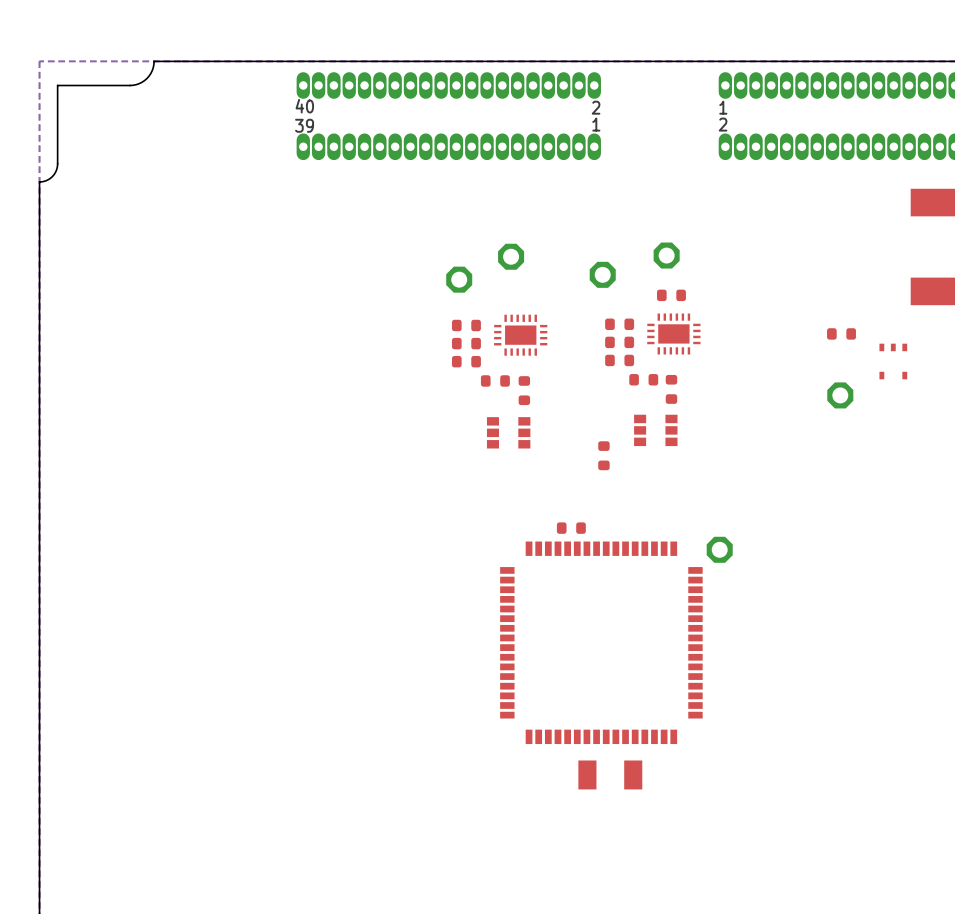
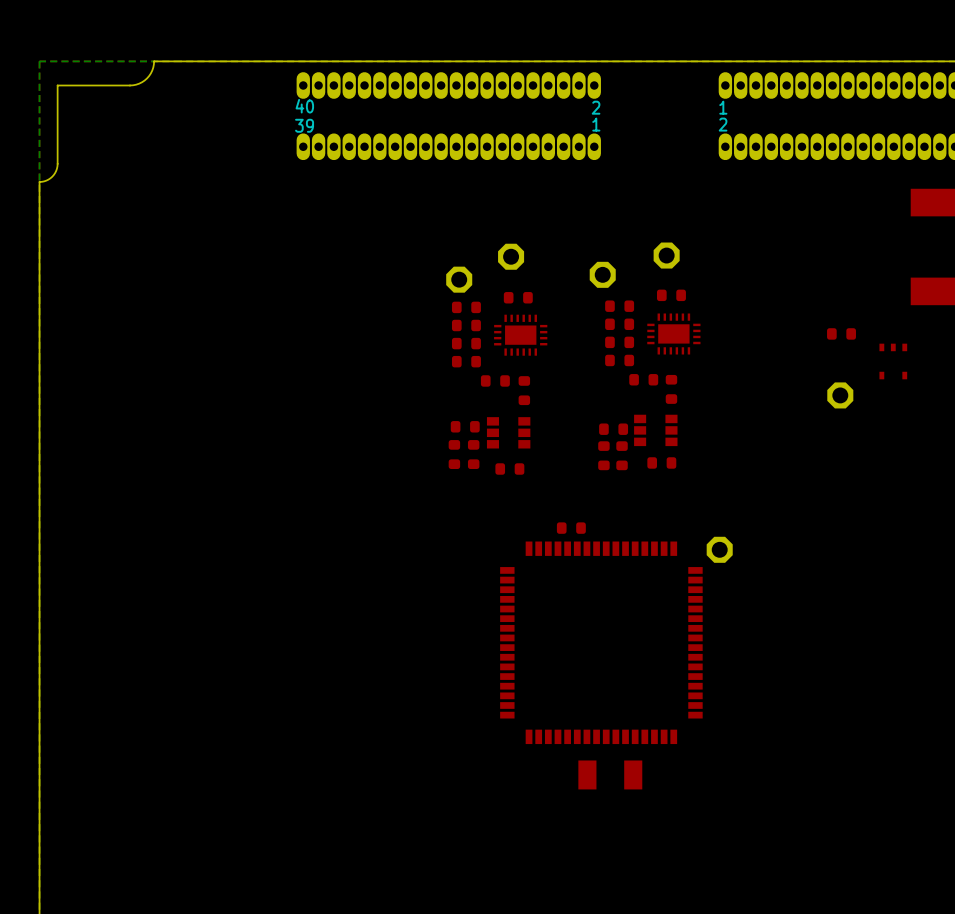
part: none -> (518, 297)
part: none -> (619, 306)
part: none -> (466, 307)
part: none -> (465, 426)
part: none -> (613, 429)
part: none -> (454, 454)
part: none -> (473, 454)
part: none -> (622, 455)
part: none -> (661, 462)
part: none -> (509, 469)

